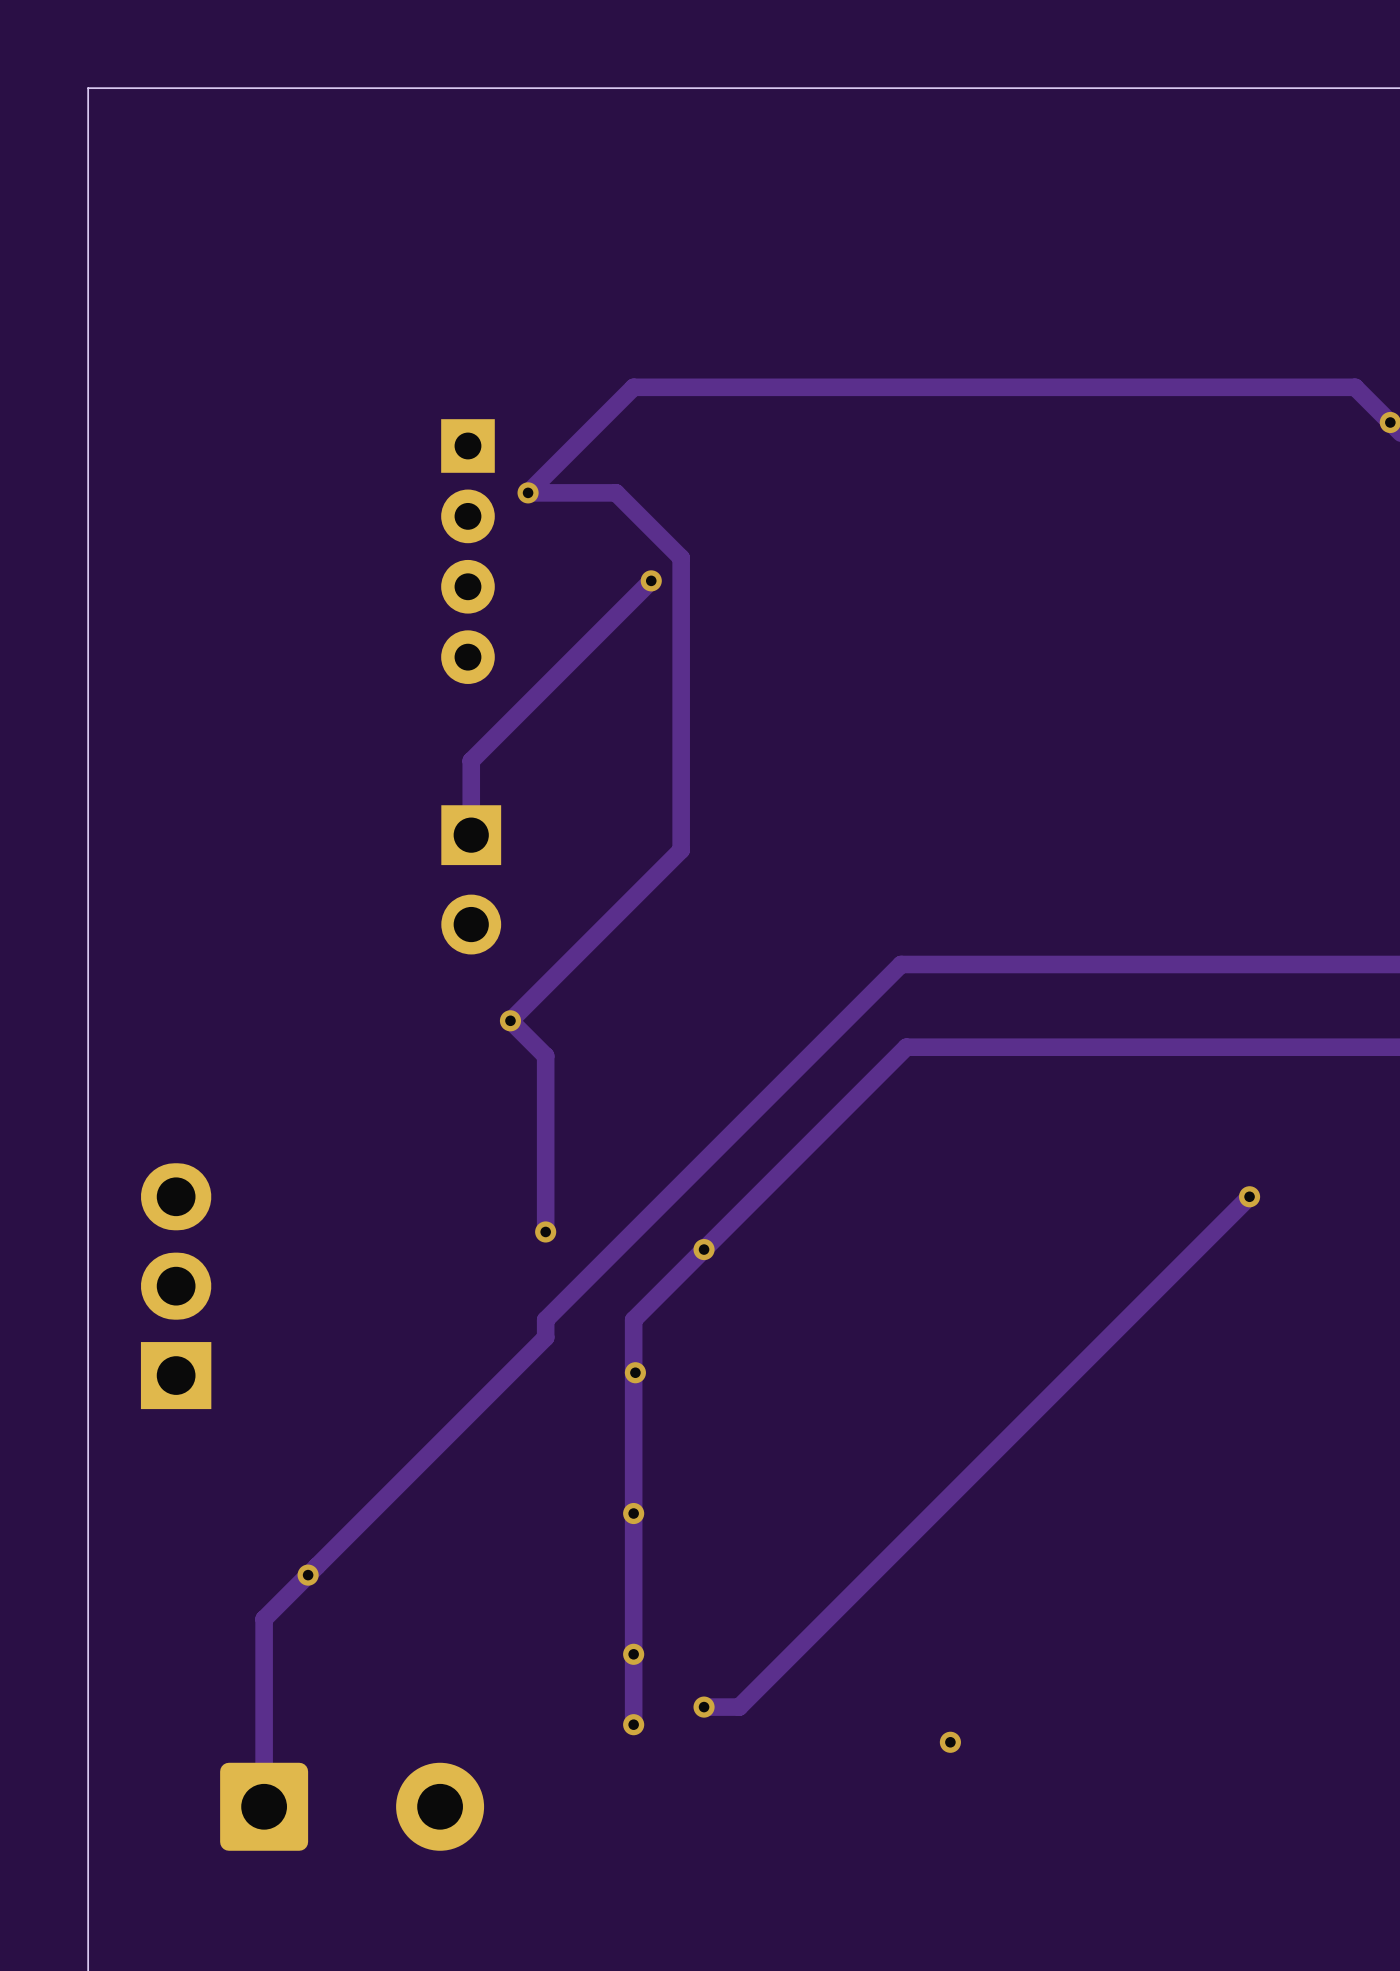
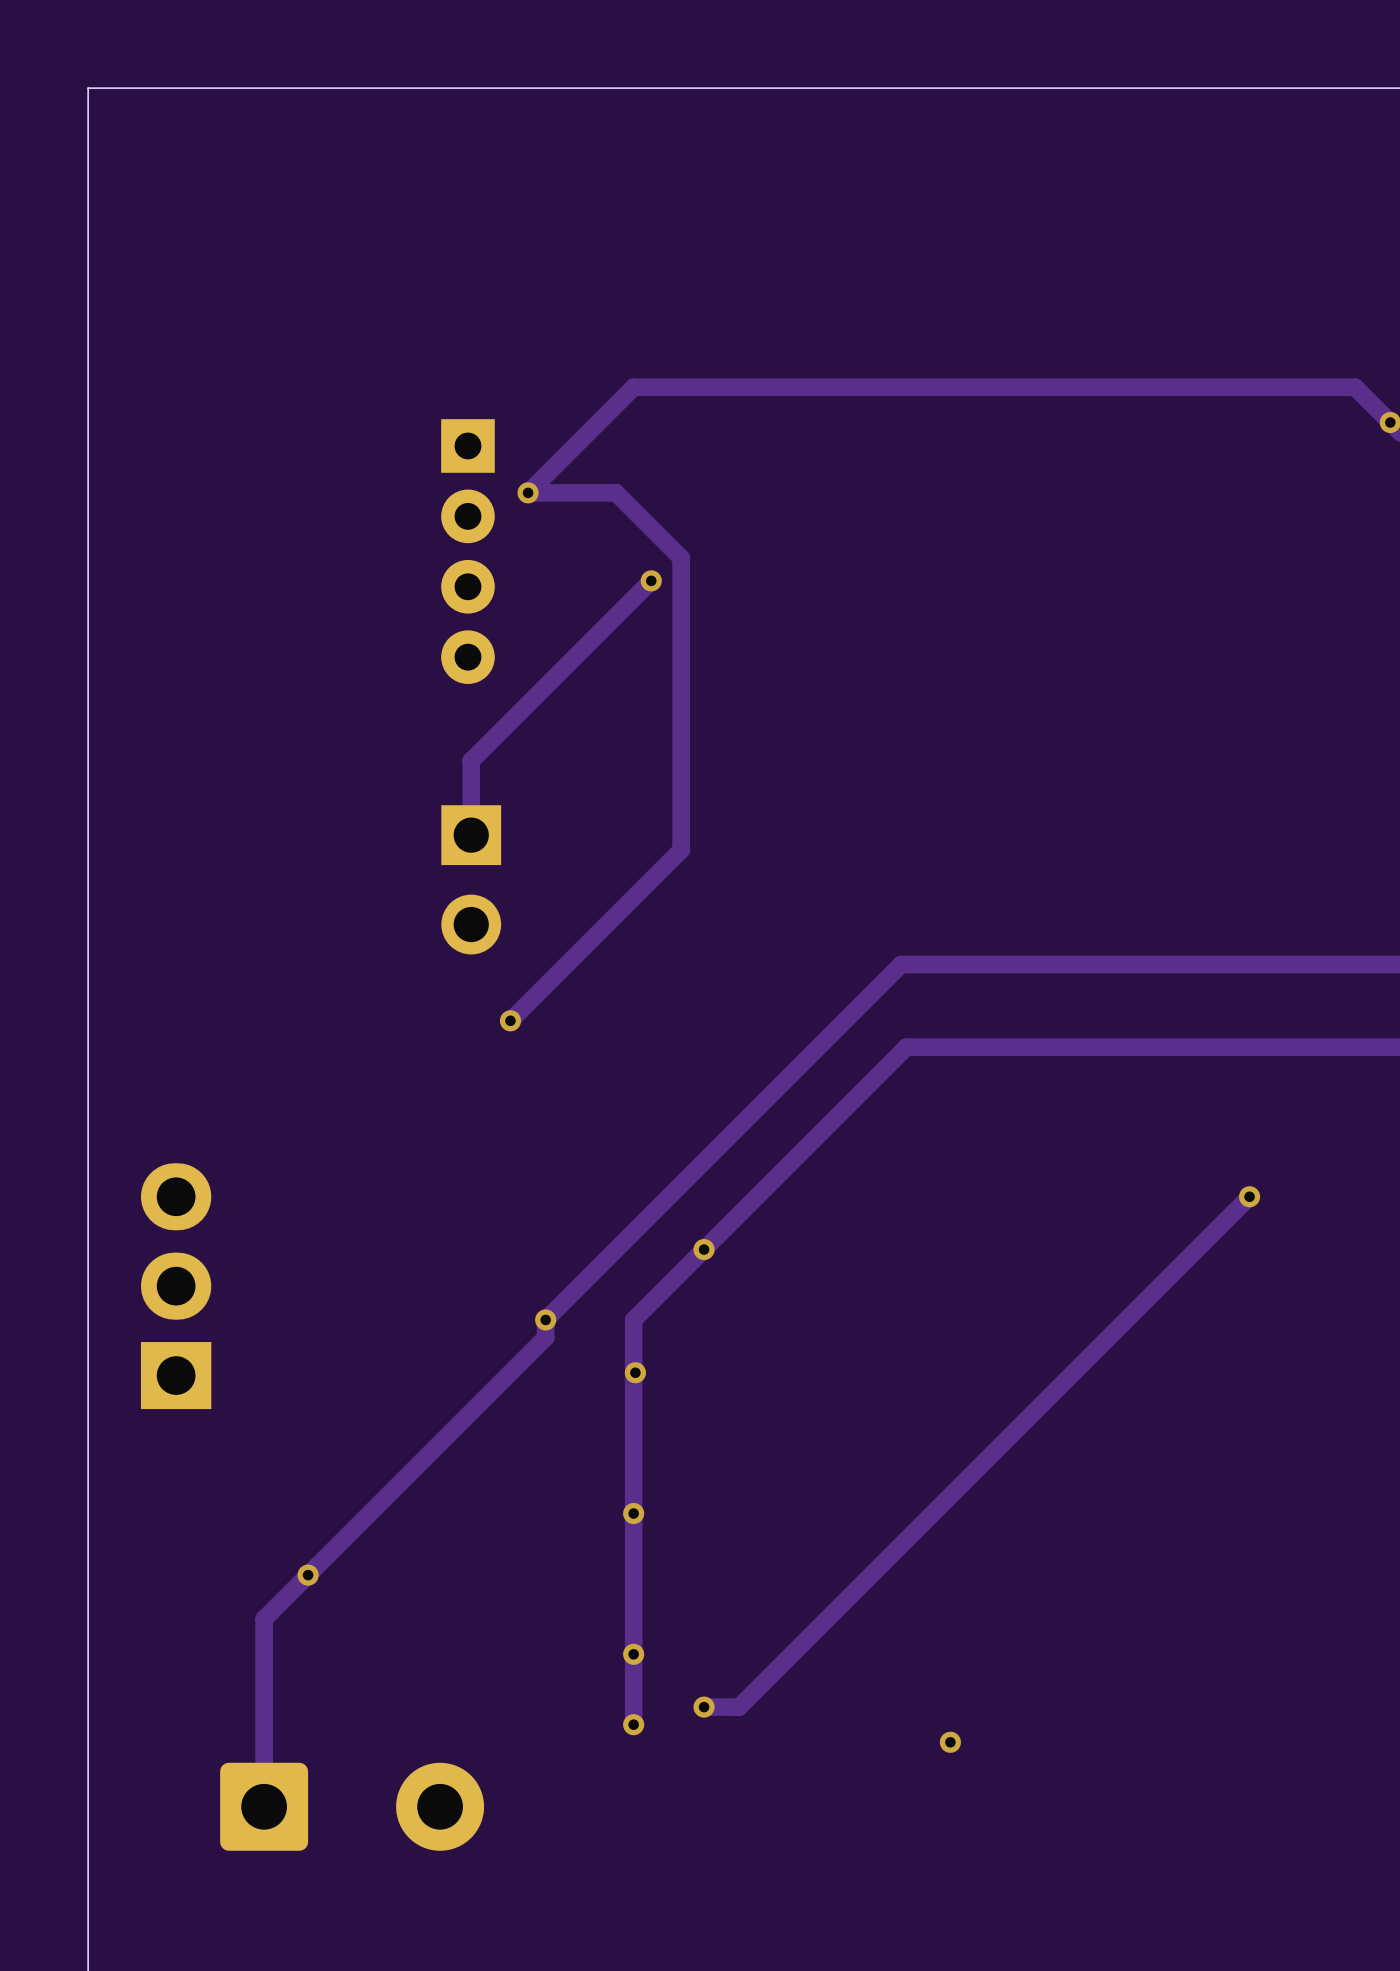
track: (510, 1020) (545, 1055) (545, 1231) -> none
via position: (545, 1231) -> (545, 1319)

